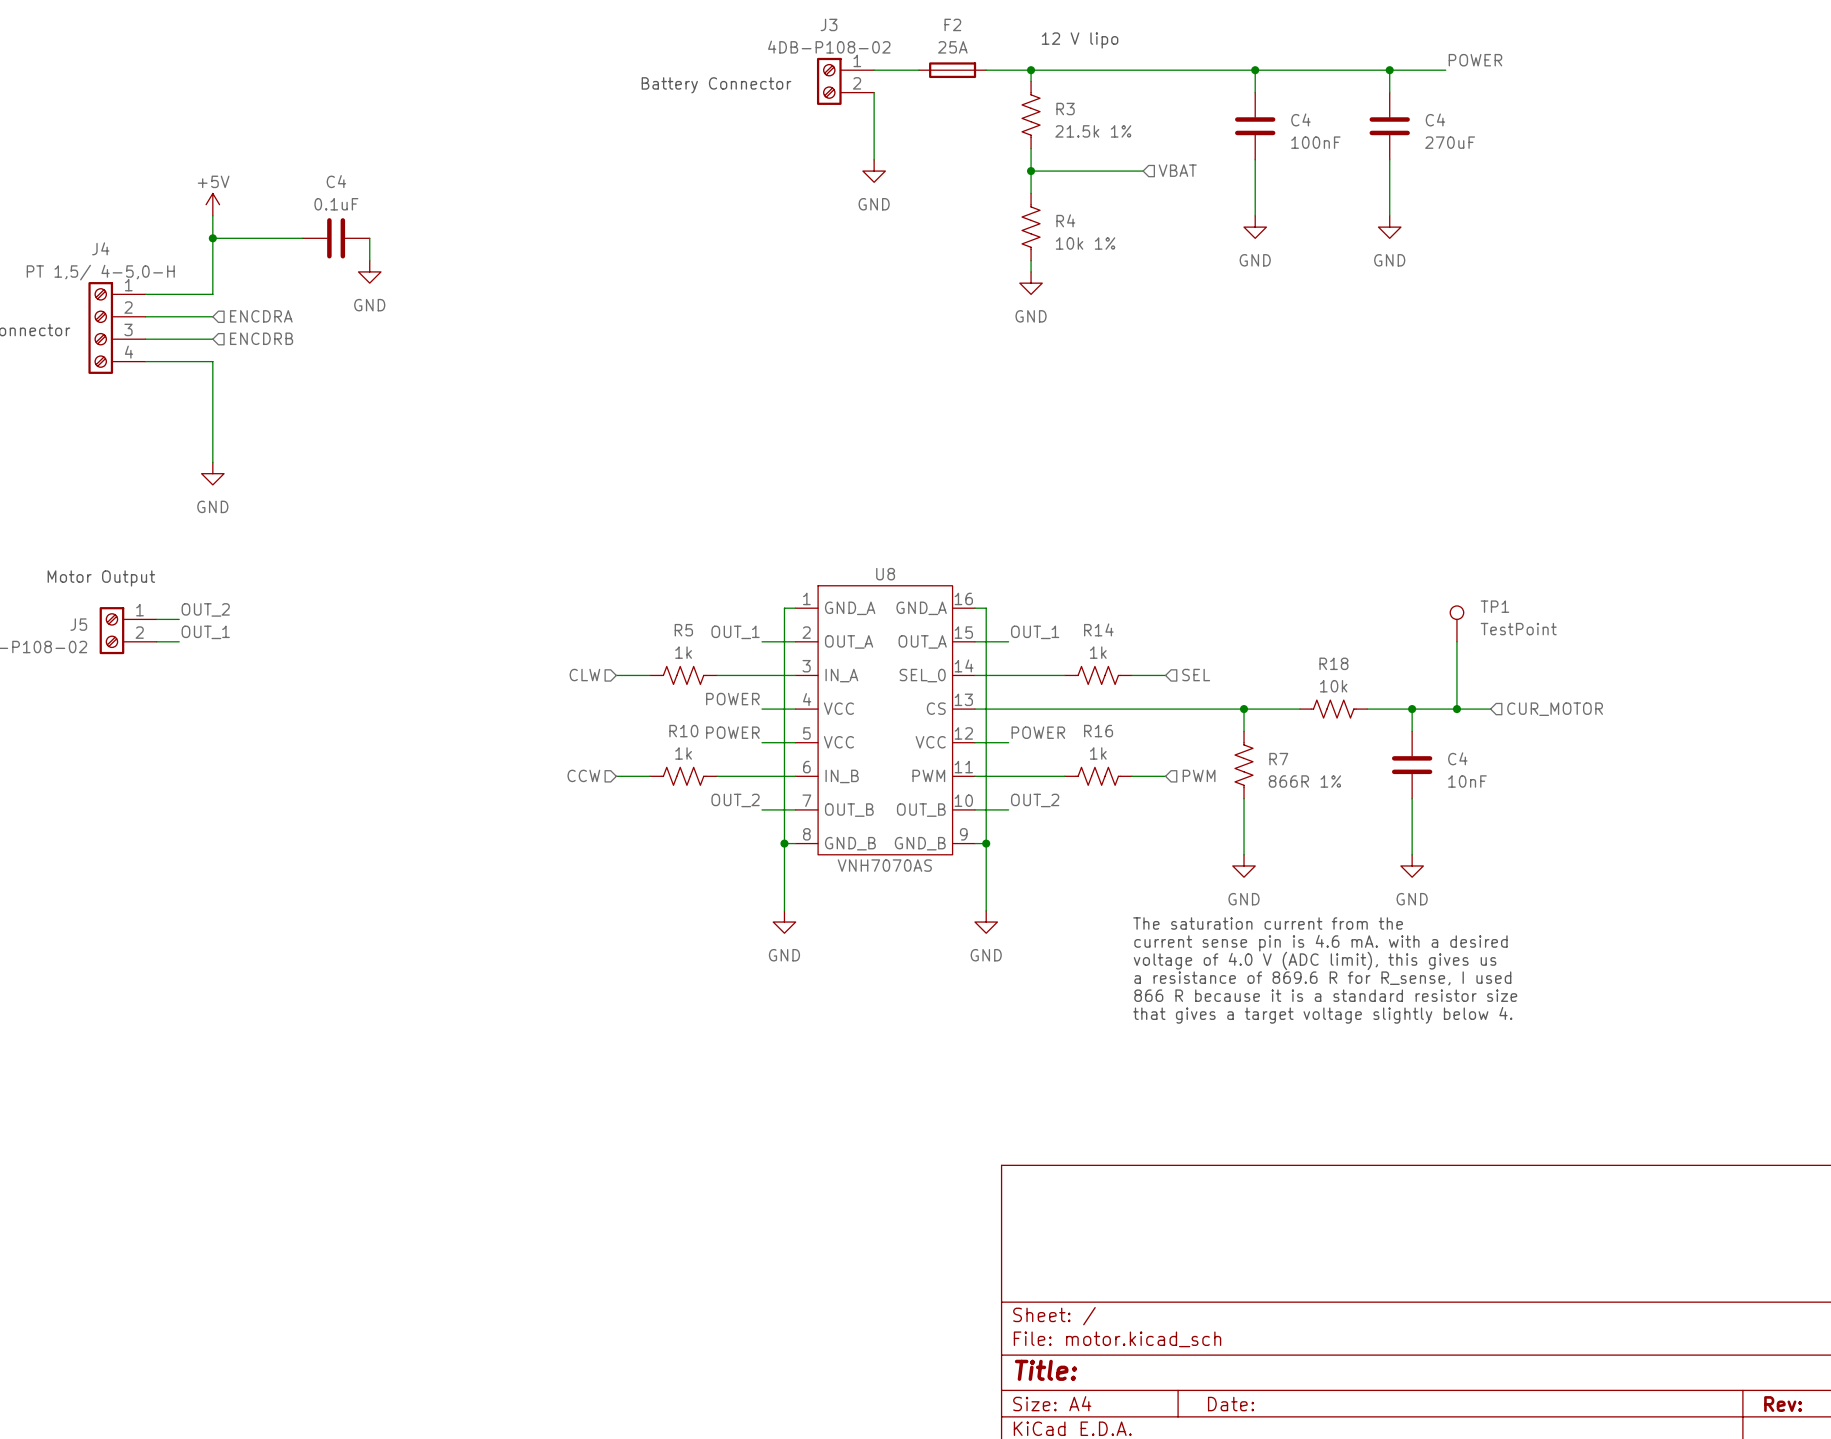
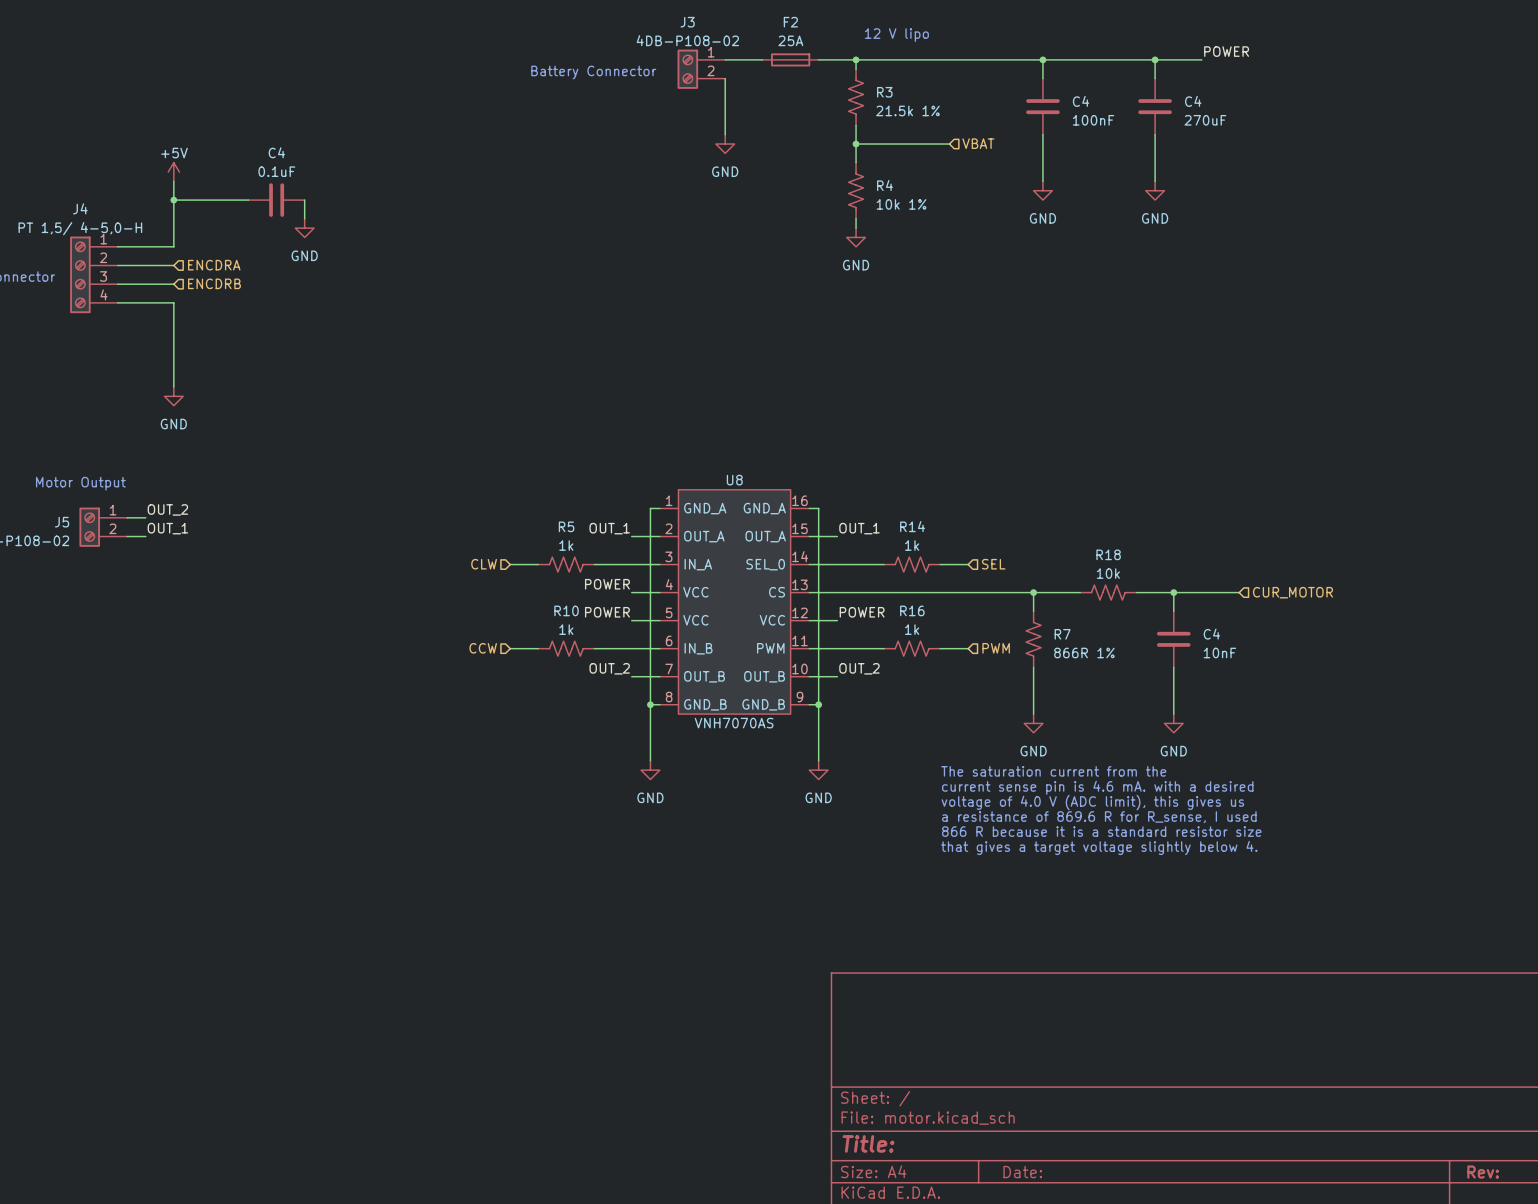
TP1: TestPoint (1456, 623) -> none
wire: (1456, 641) (1456, 709) -> none
junction: (1456, 709) -> none

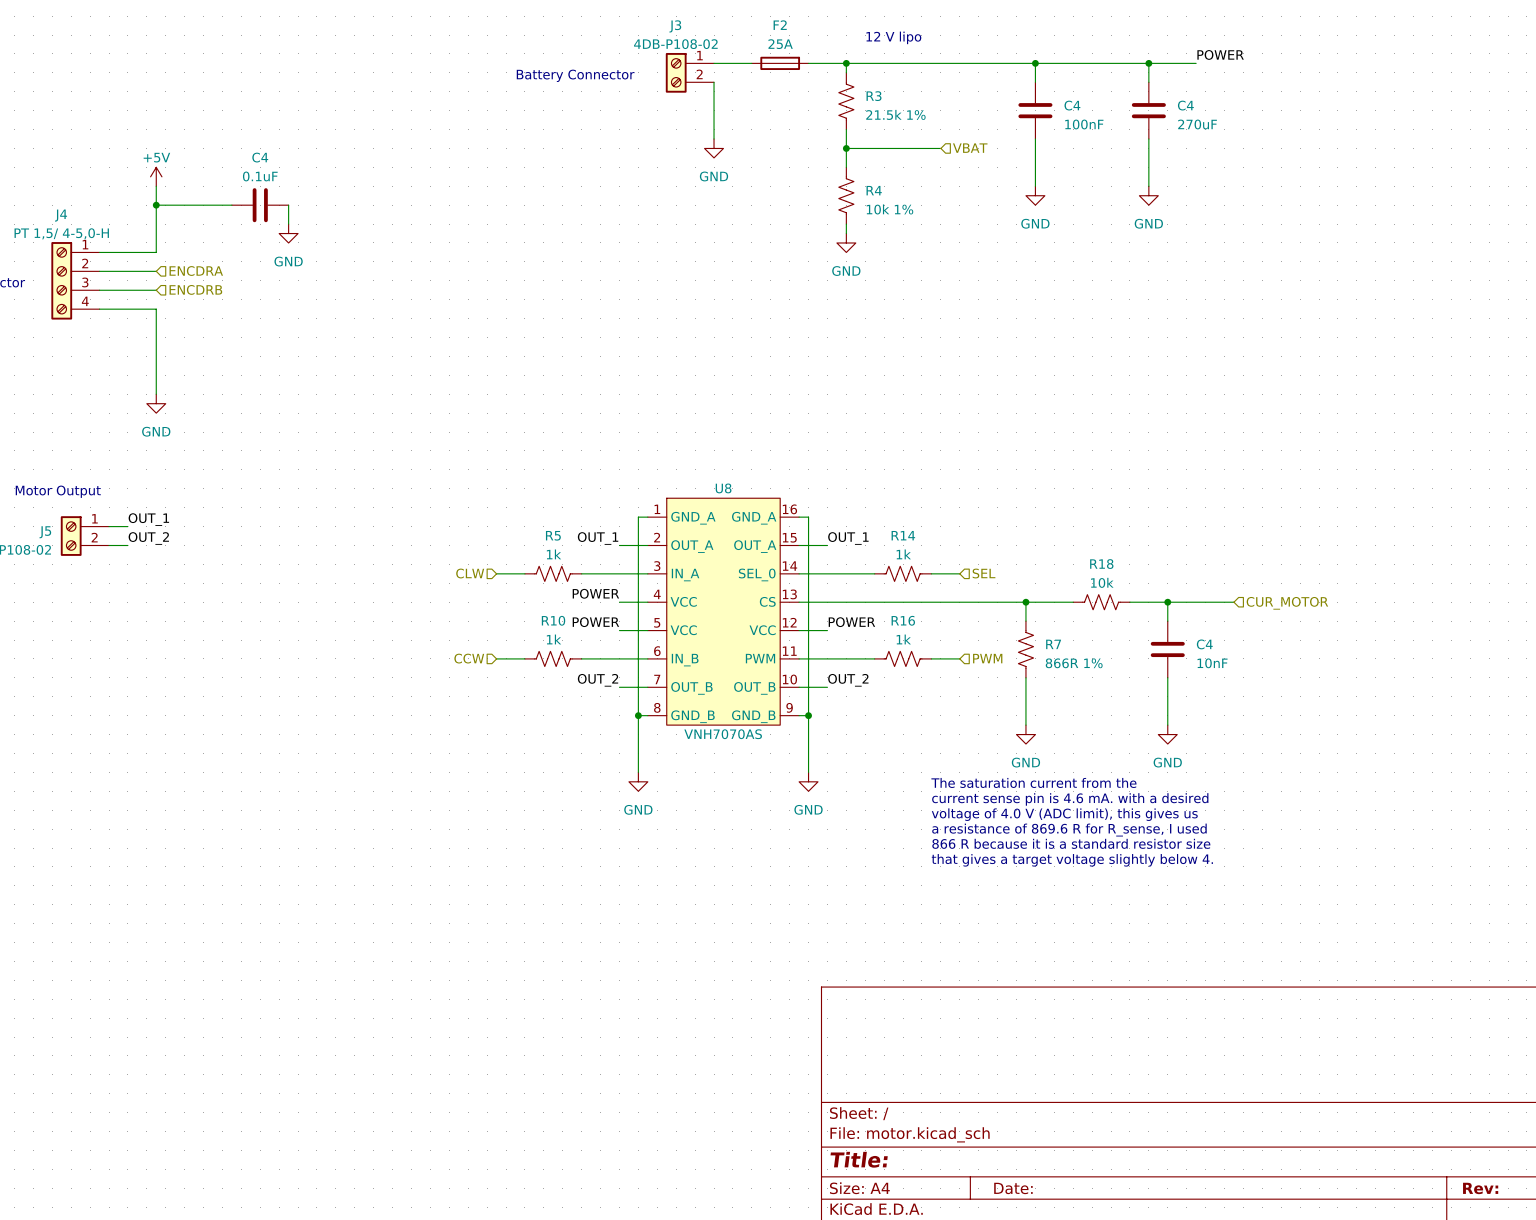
label: OUT_2 (167, 509) -> OUT_1 (148, 519)
label: OUT_1 (167, 528) -> OUT_2 (148, 538)

